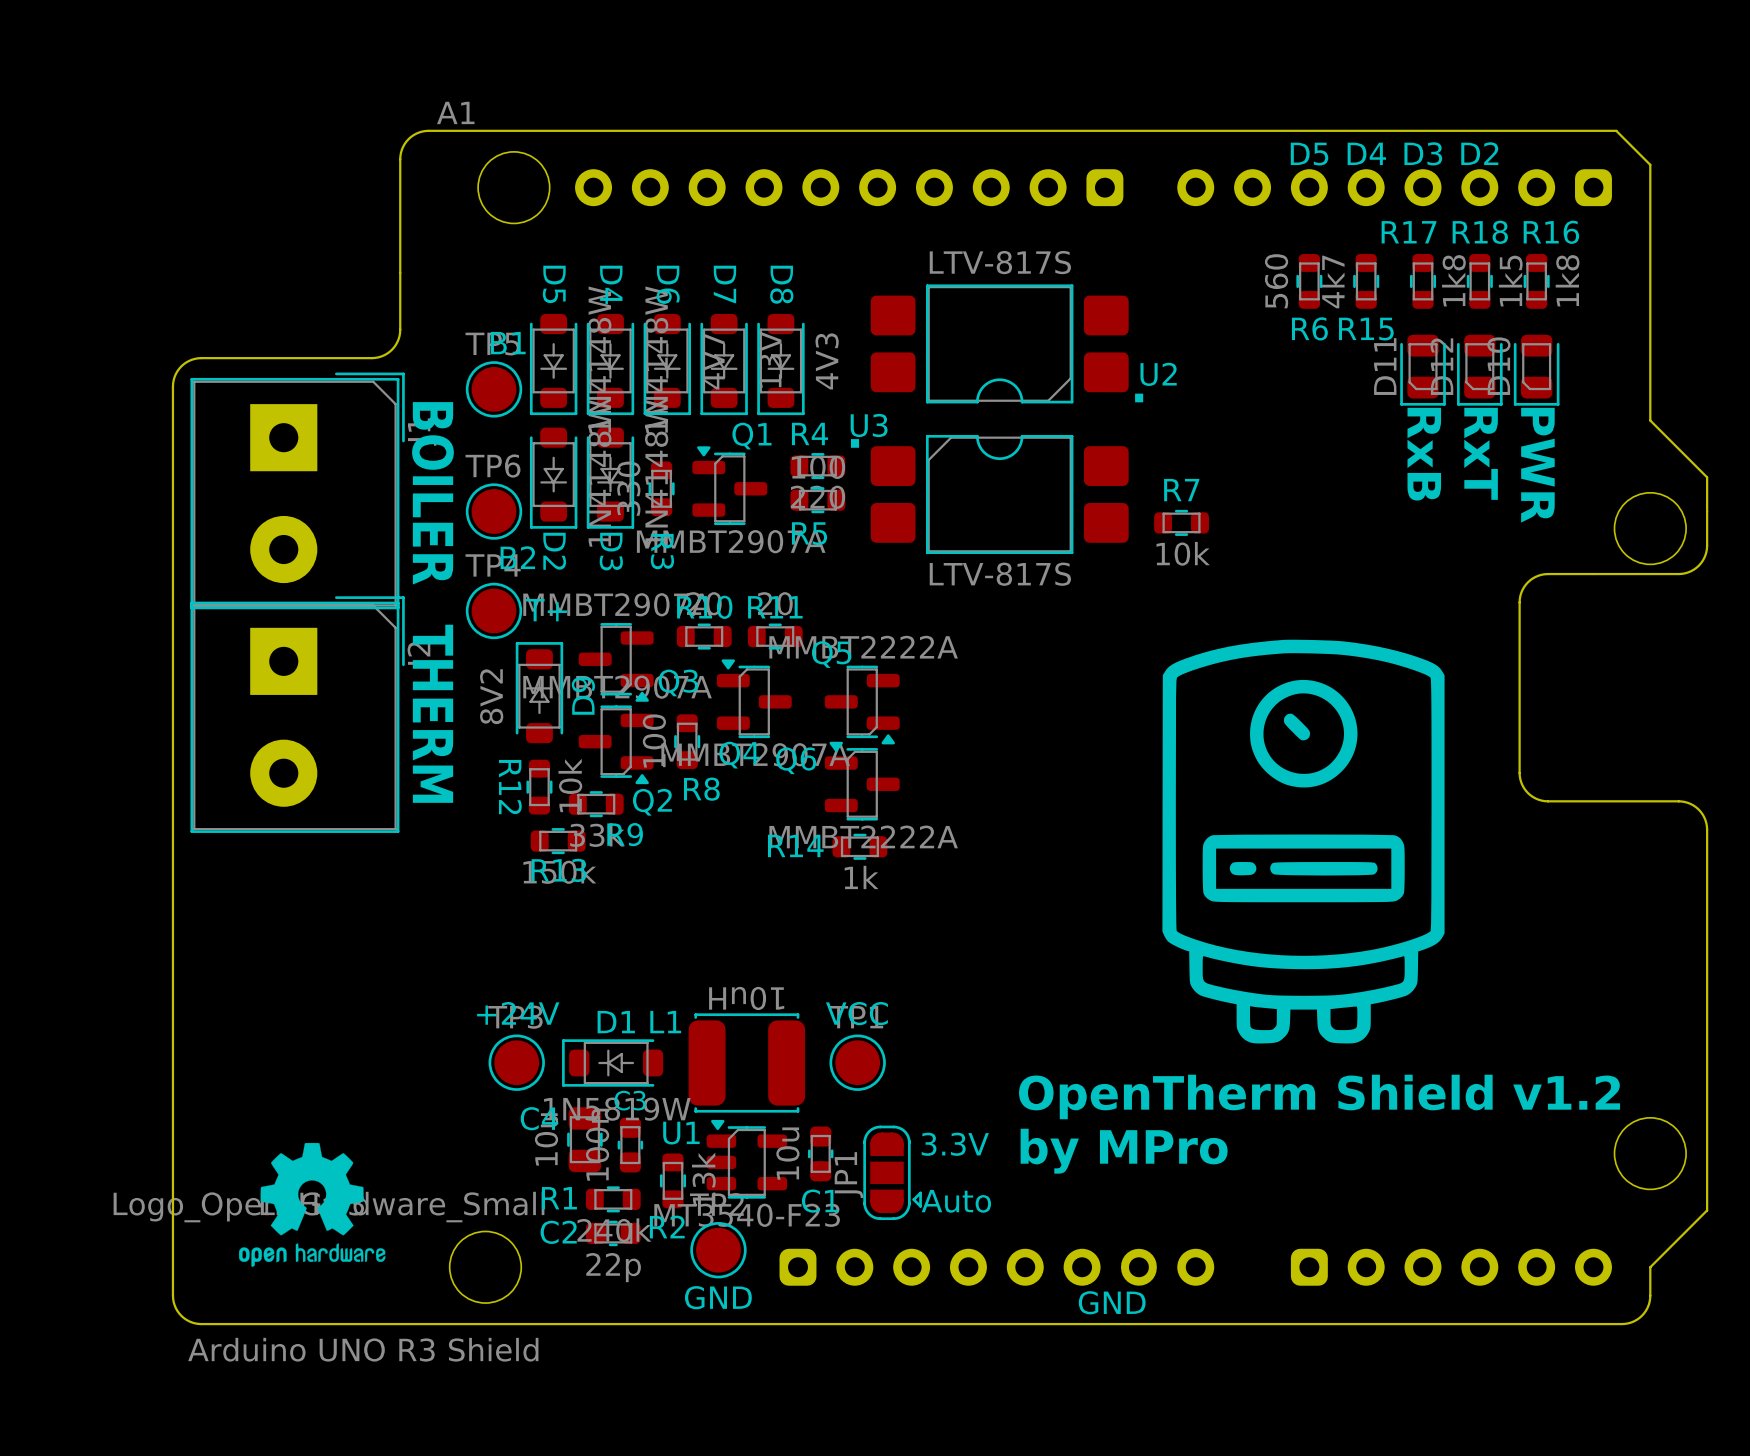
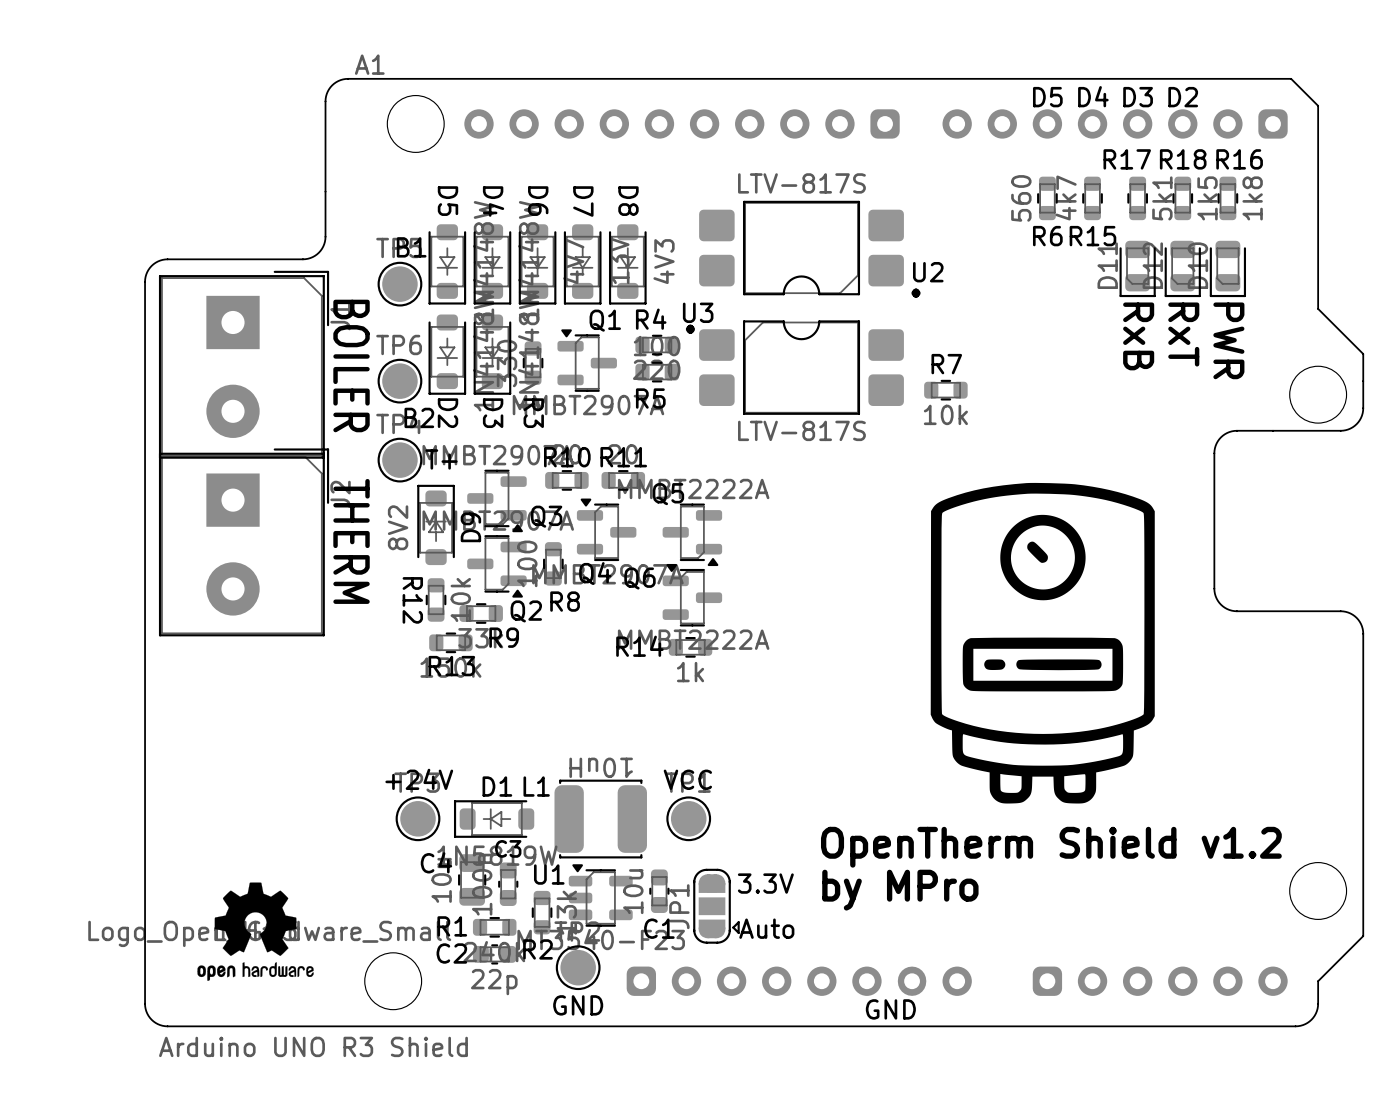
R17 value: 1k8 (1453, 280) -> 5k1 (1162, 198)

